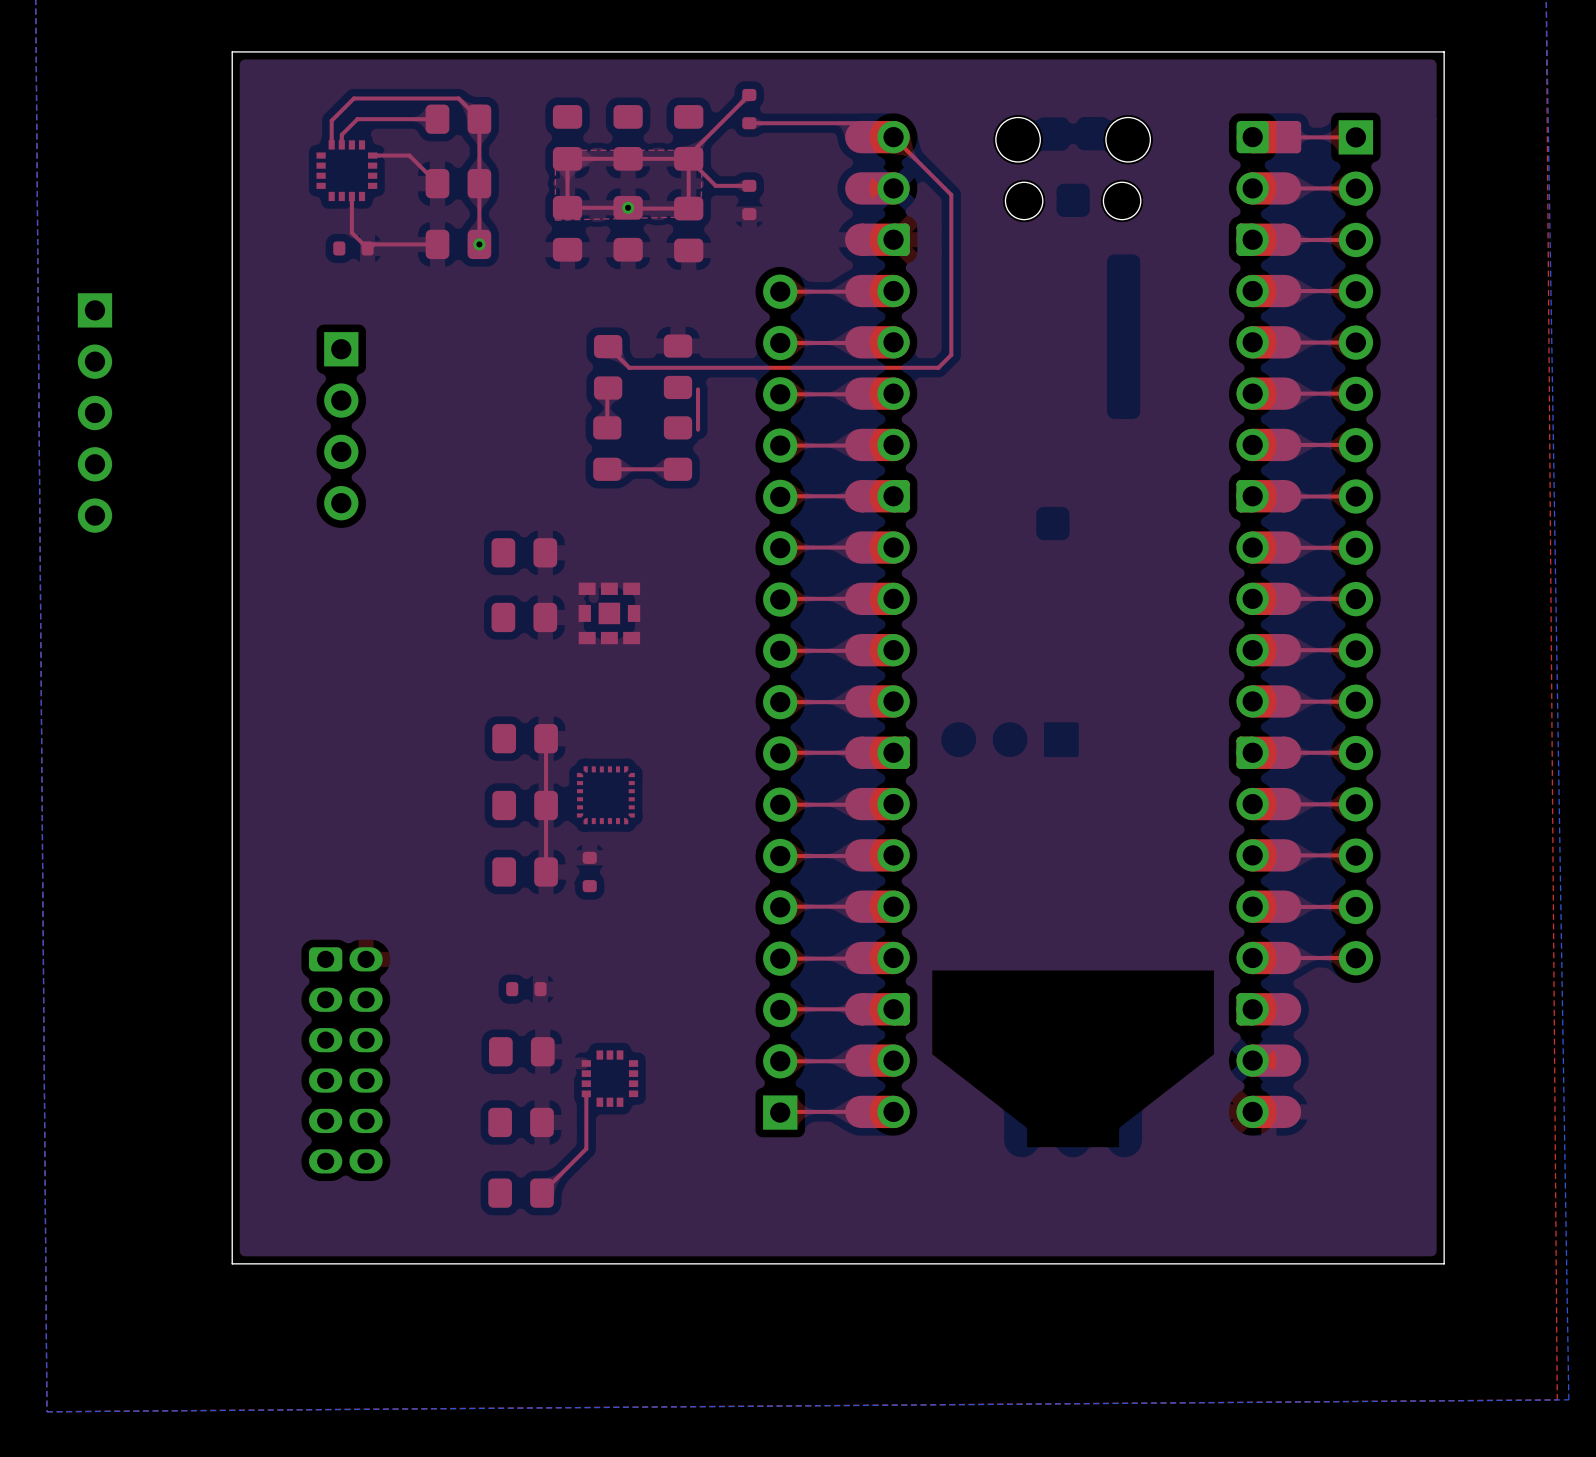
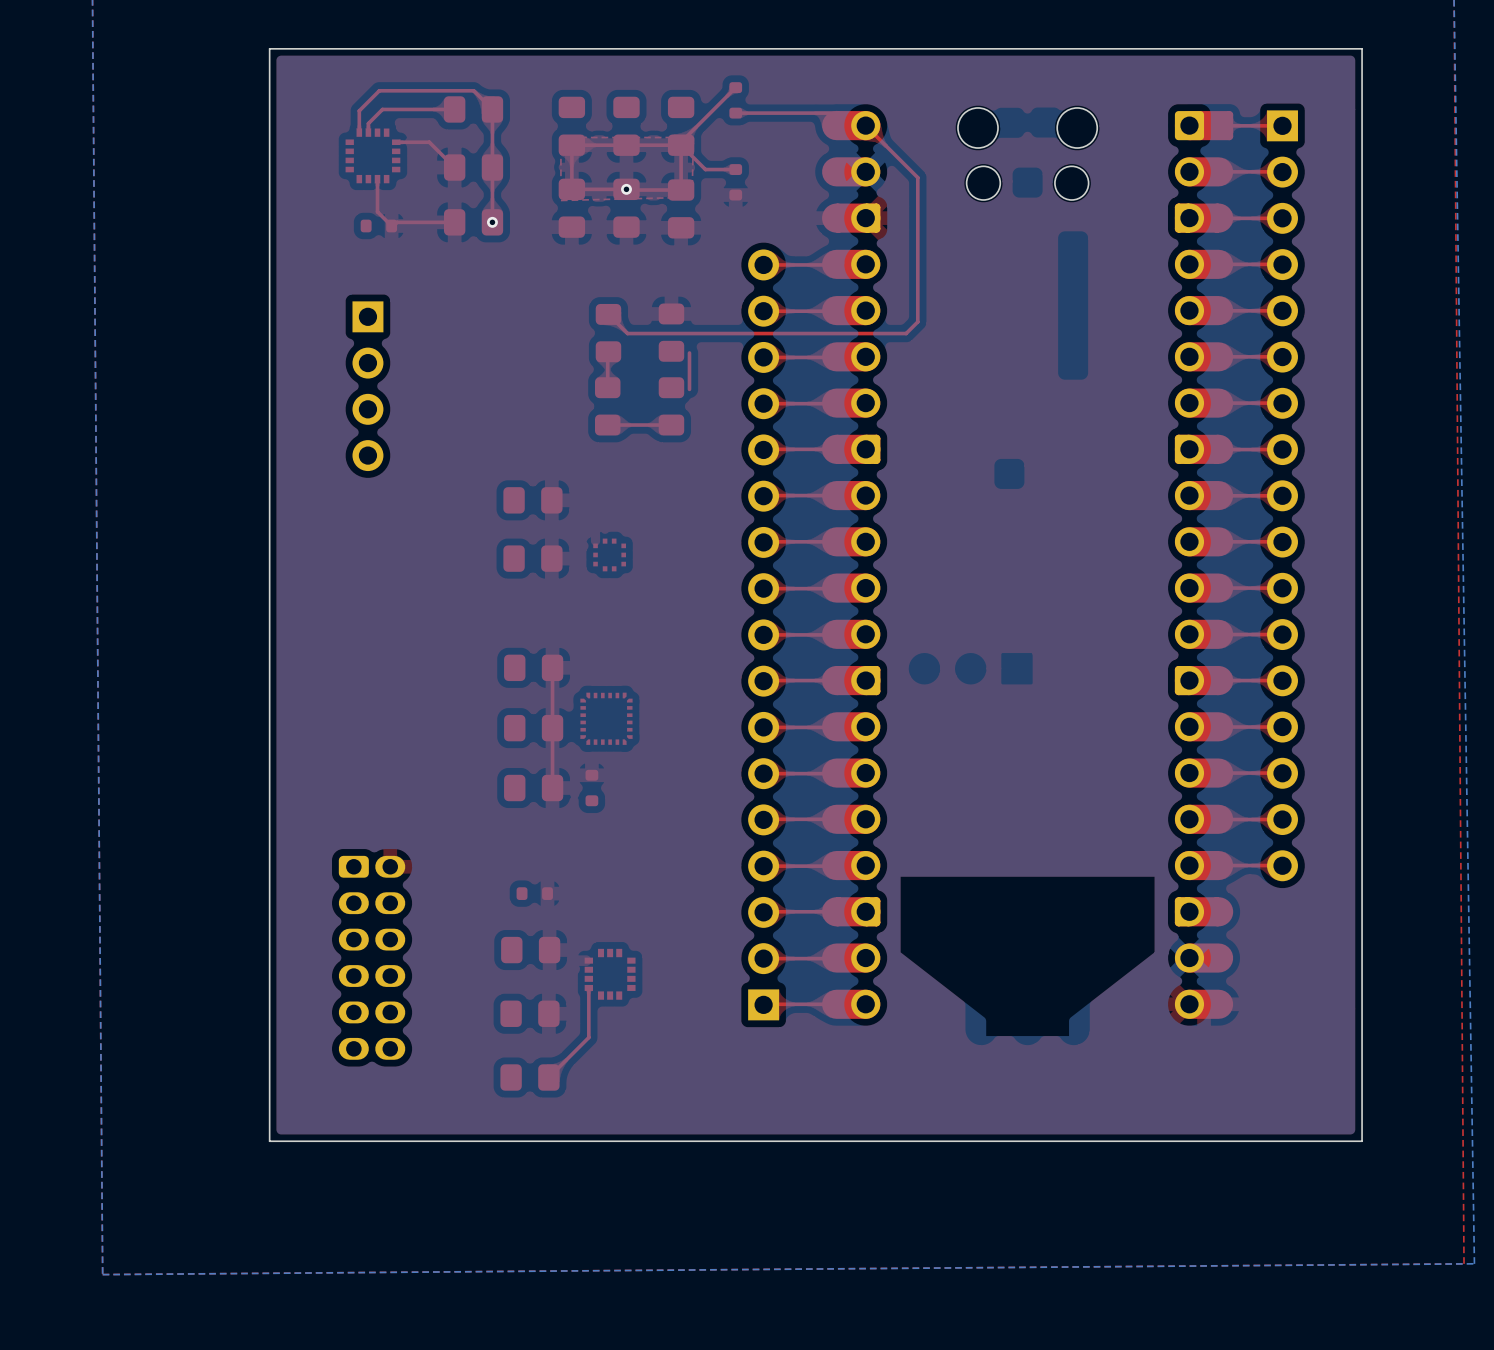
part: (94, 412) -> none
part footprint: [578, 582, 641, 645] -> [593, 538, 627, 572]

